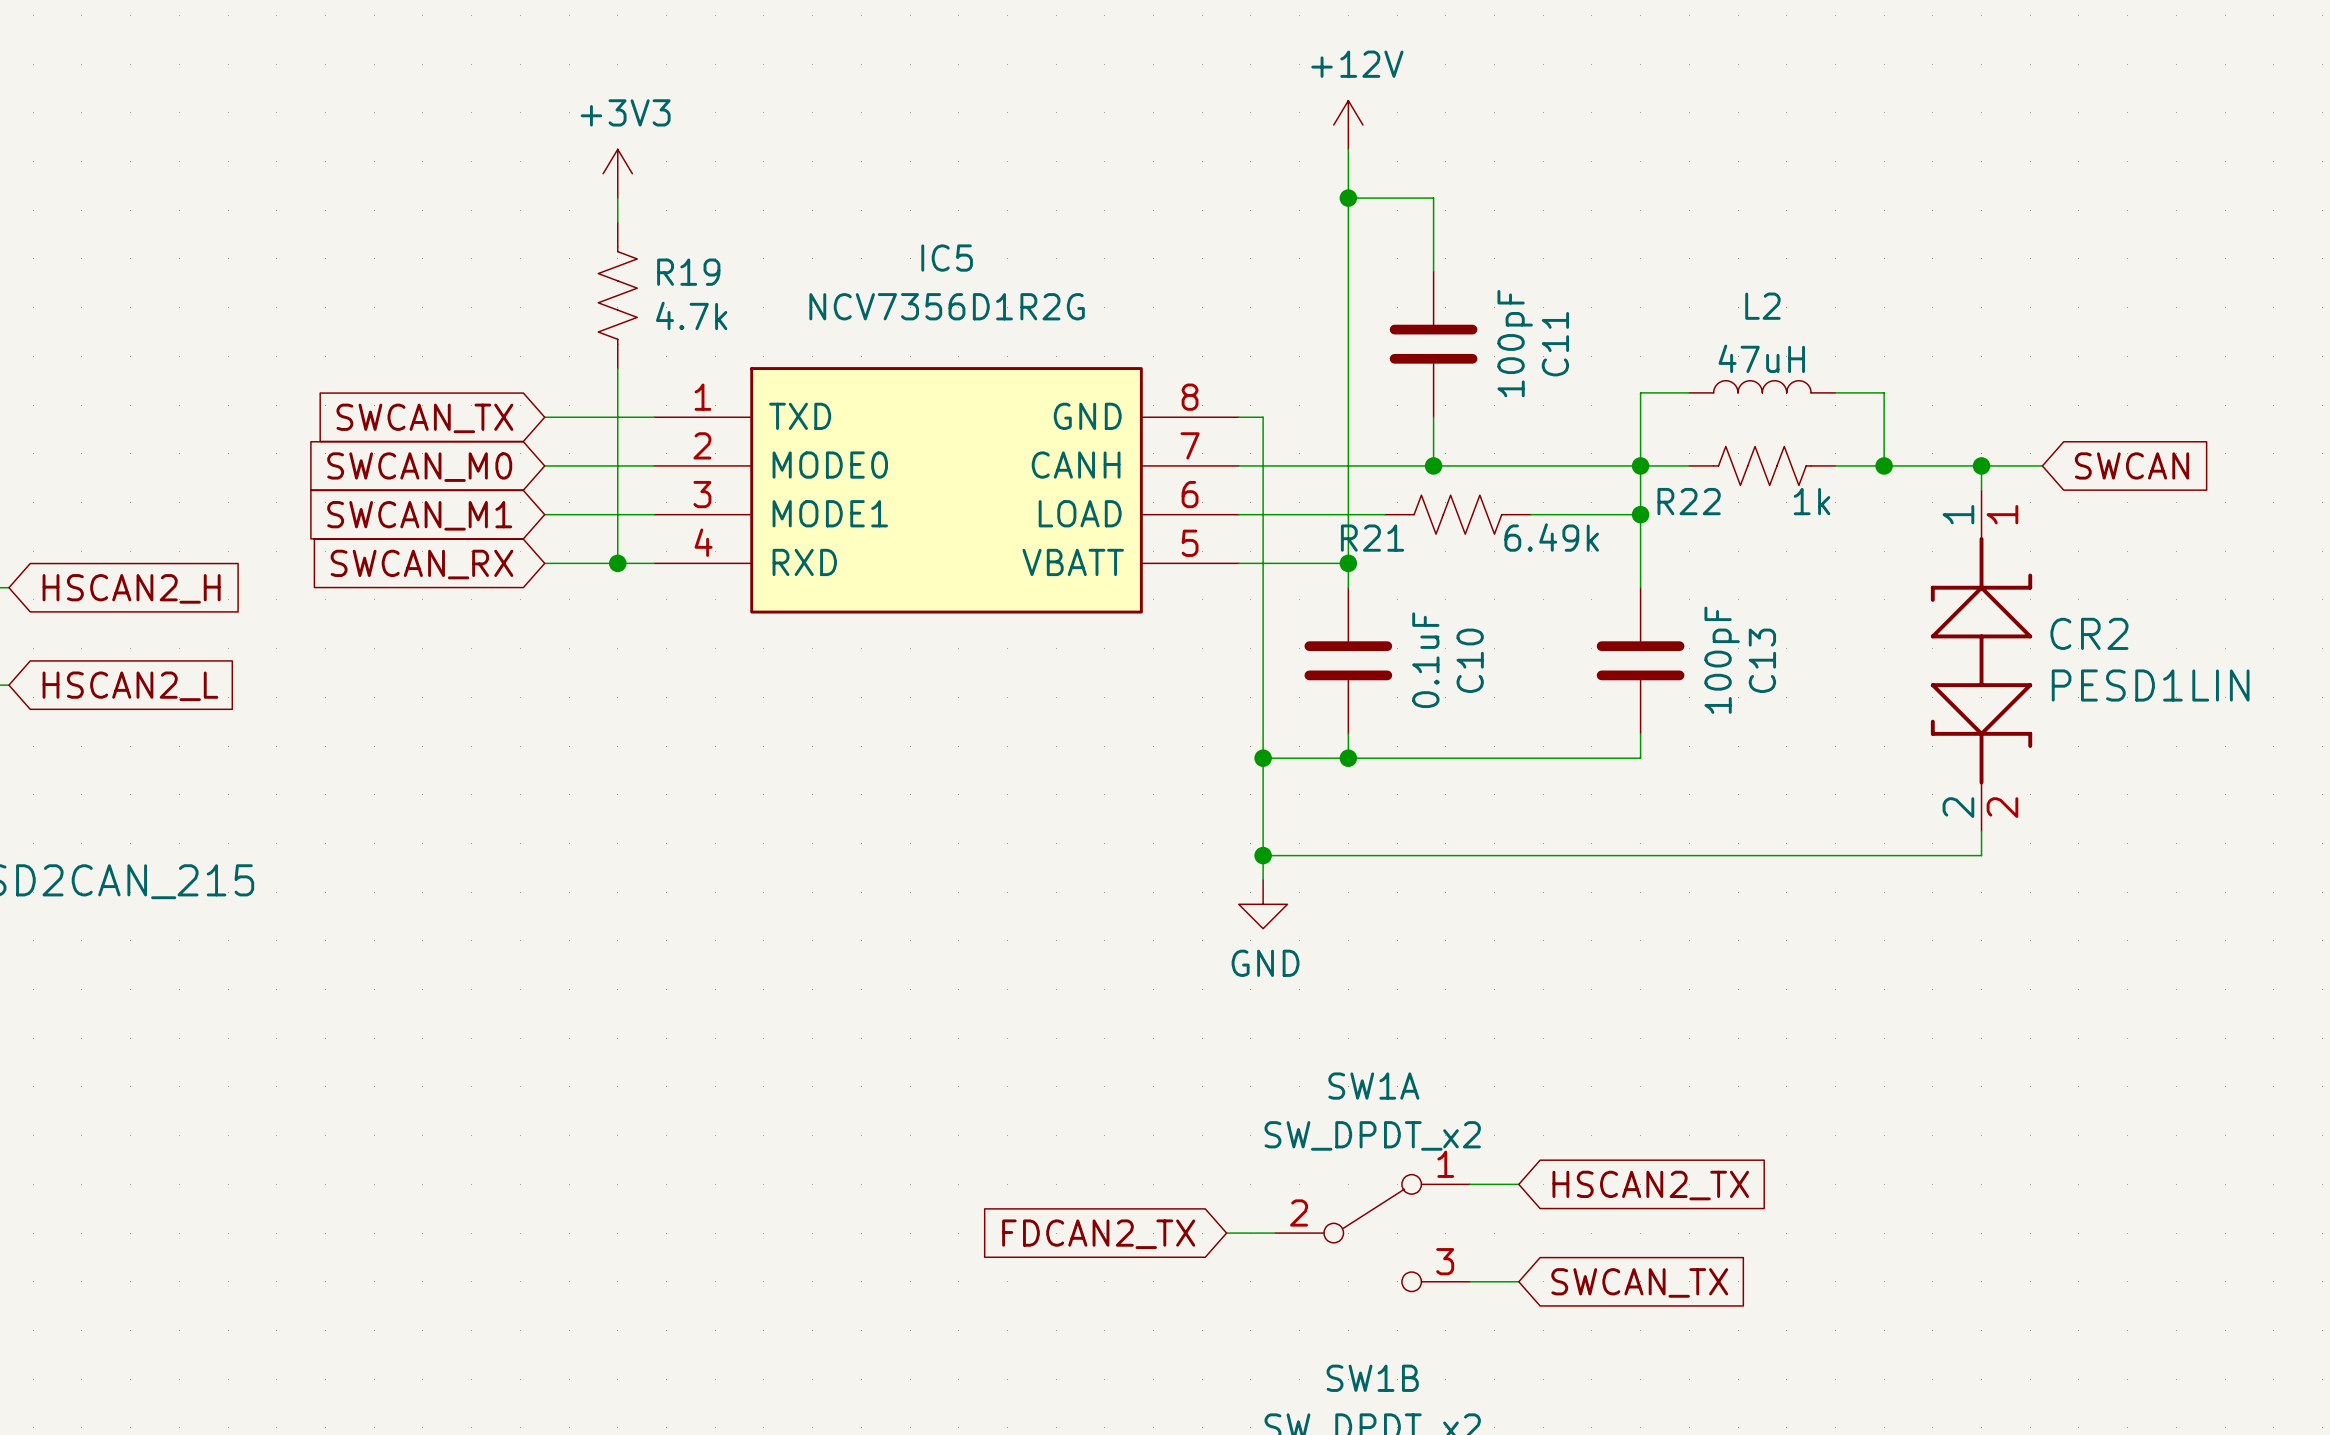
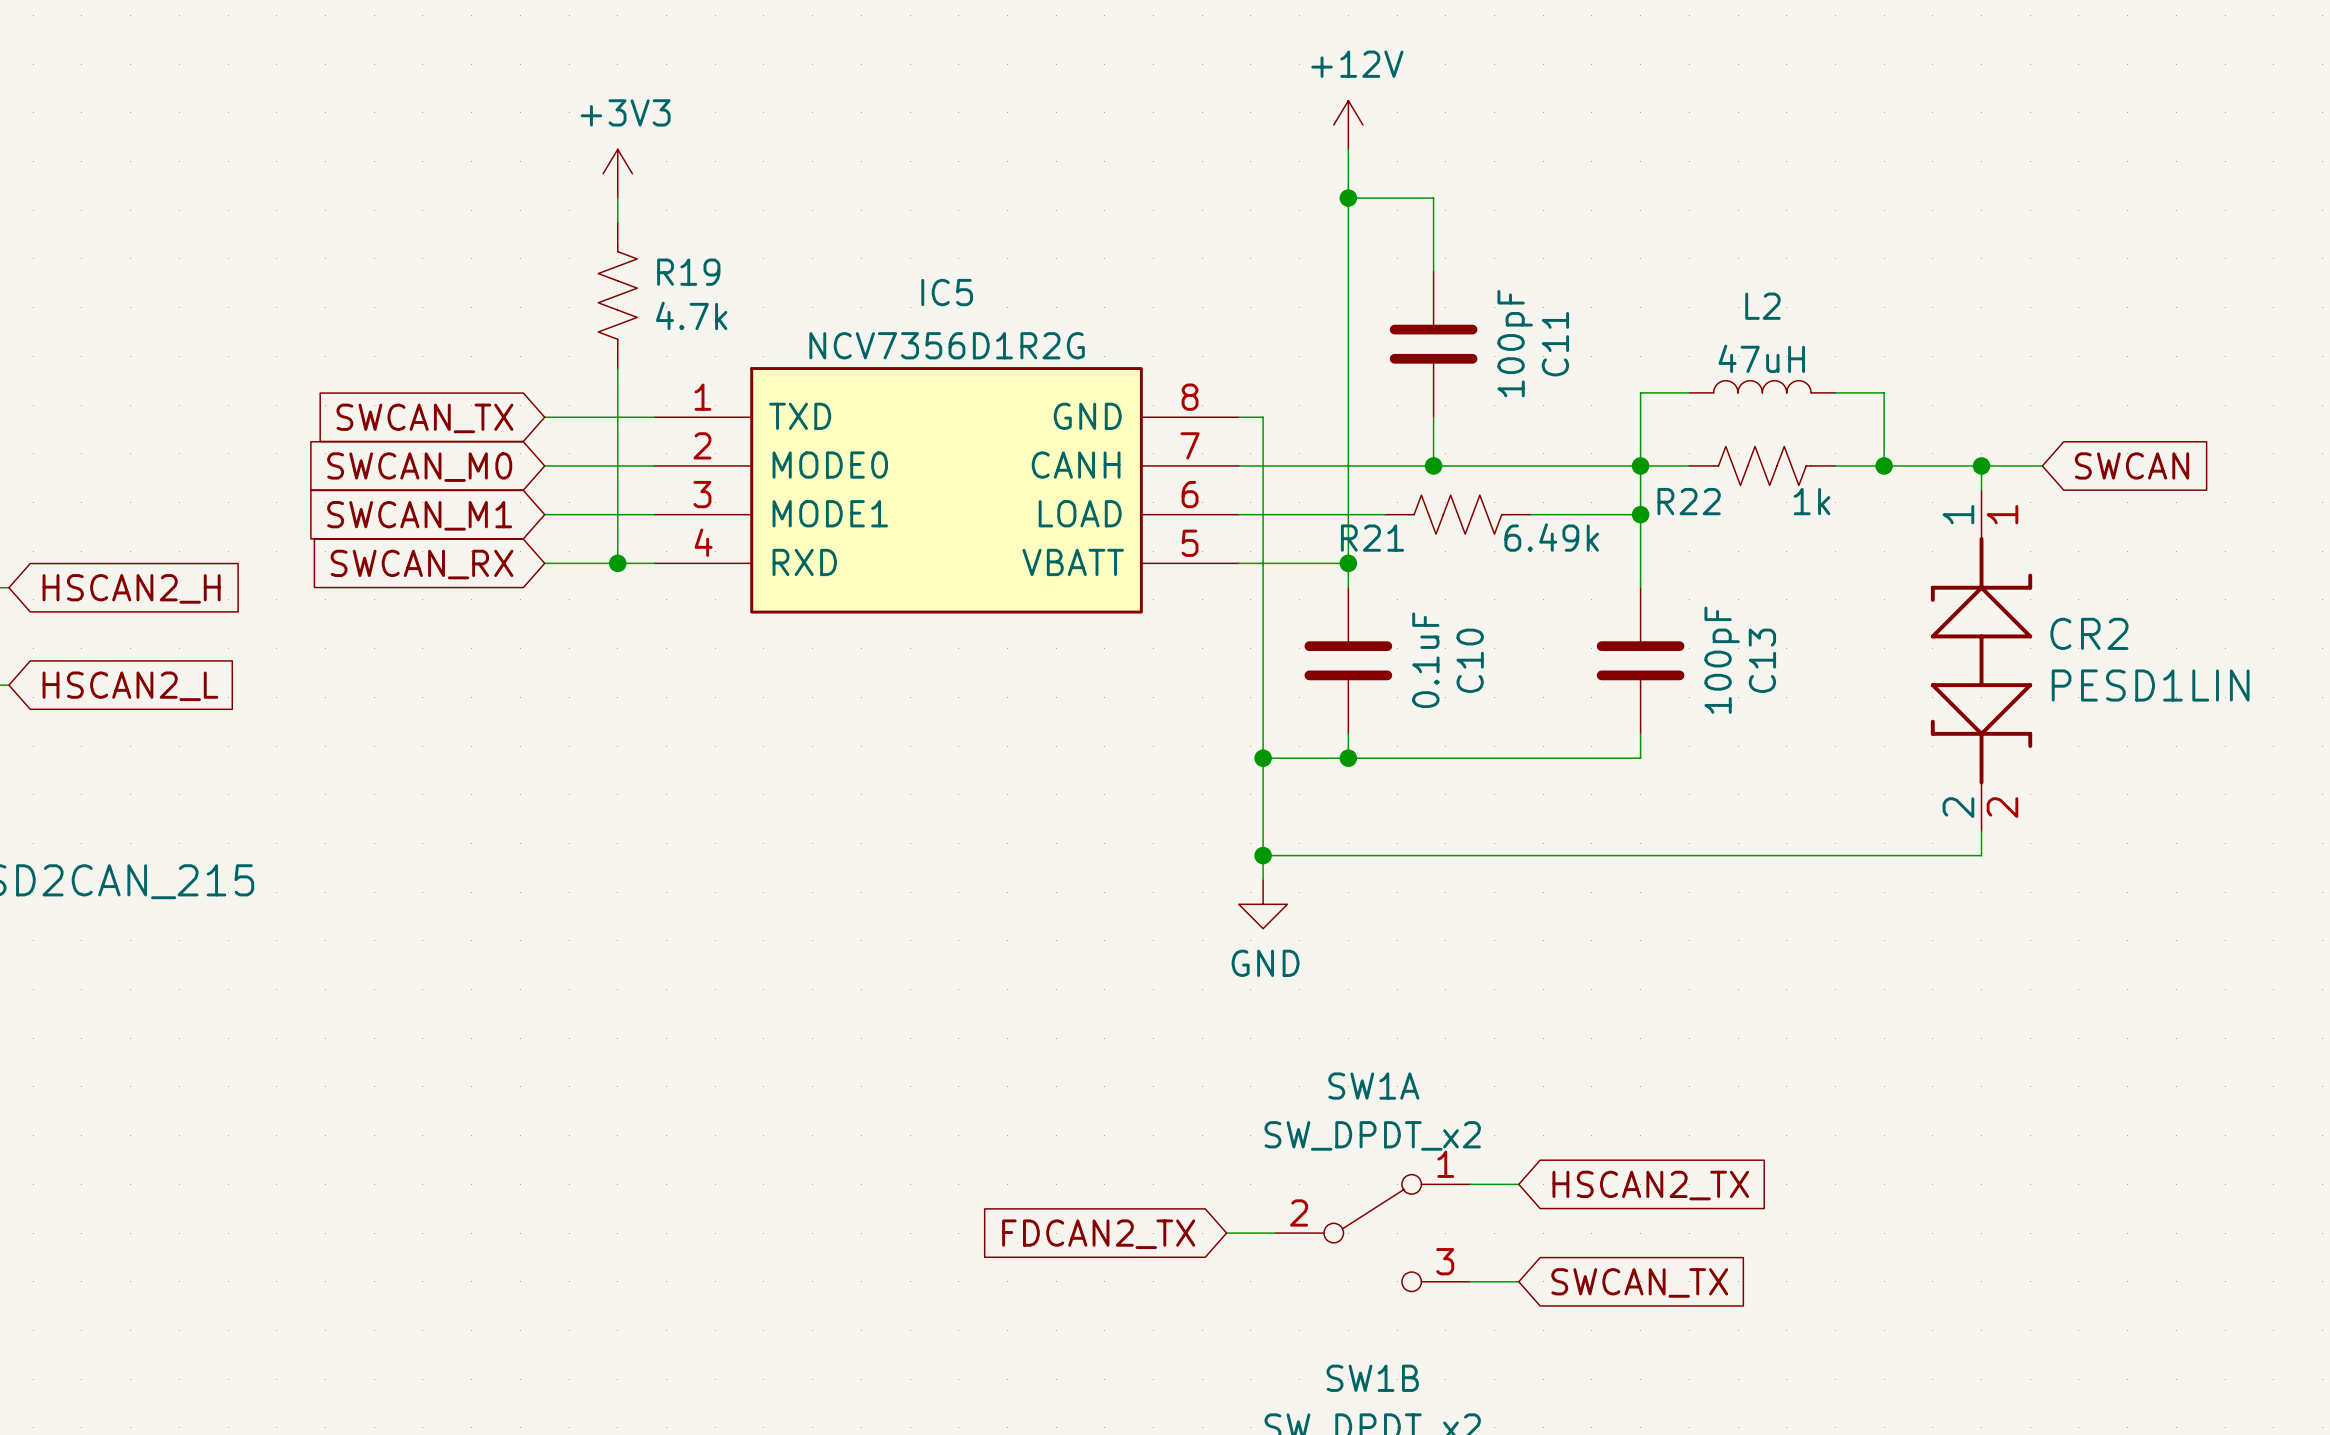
IC5 name position: IC5 (947, 258) -> IC5 (947, 292)
IC5 value position: NCV7356D1R2G (947, 306) -> NCV7356D1R2G (947, 345)

